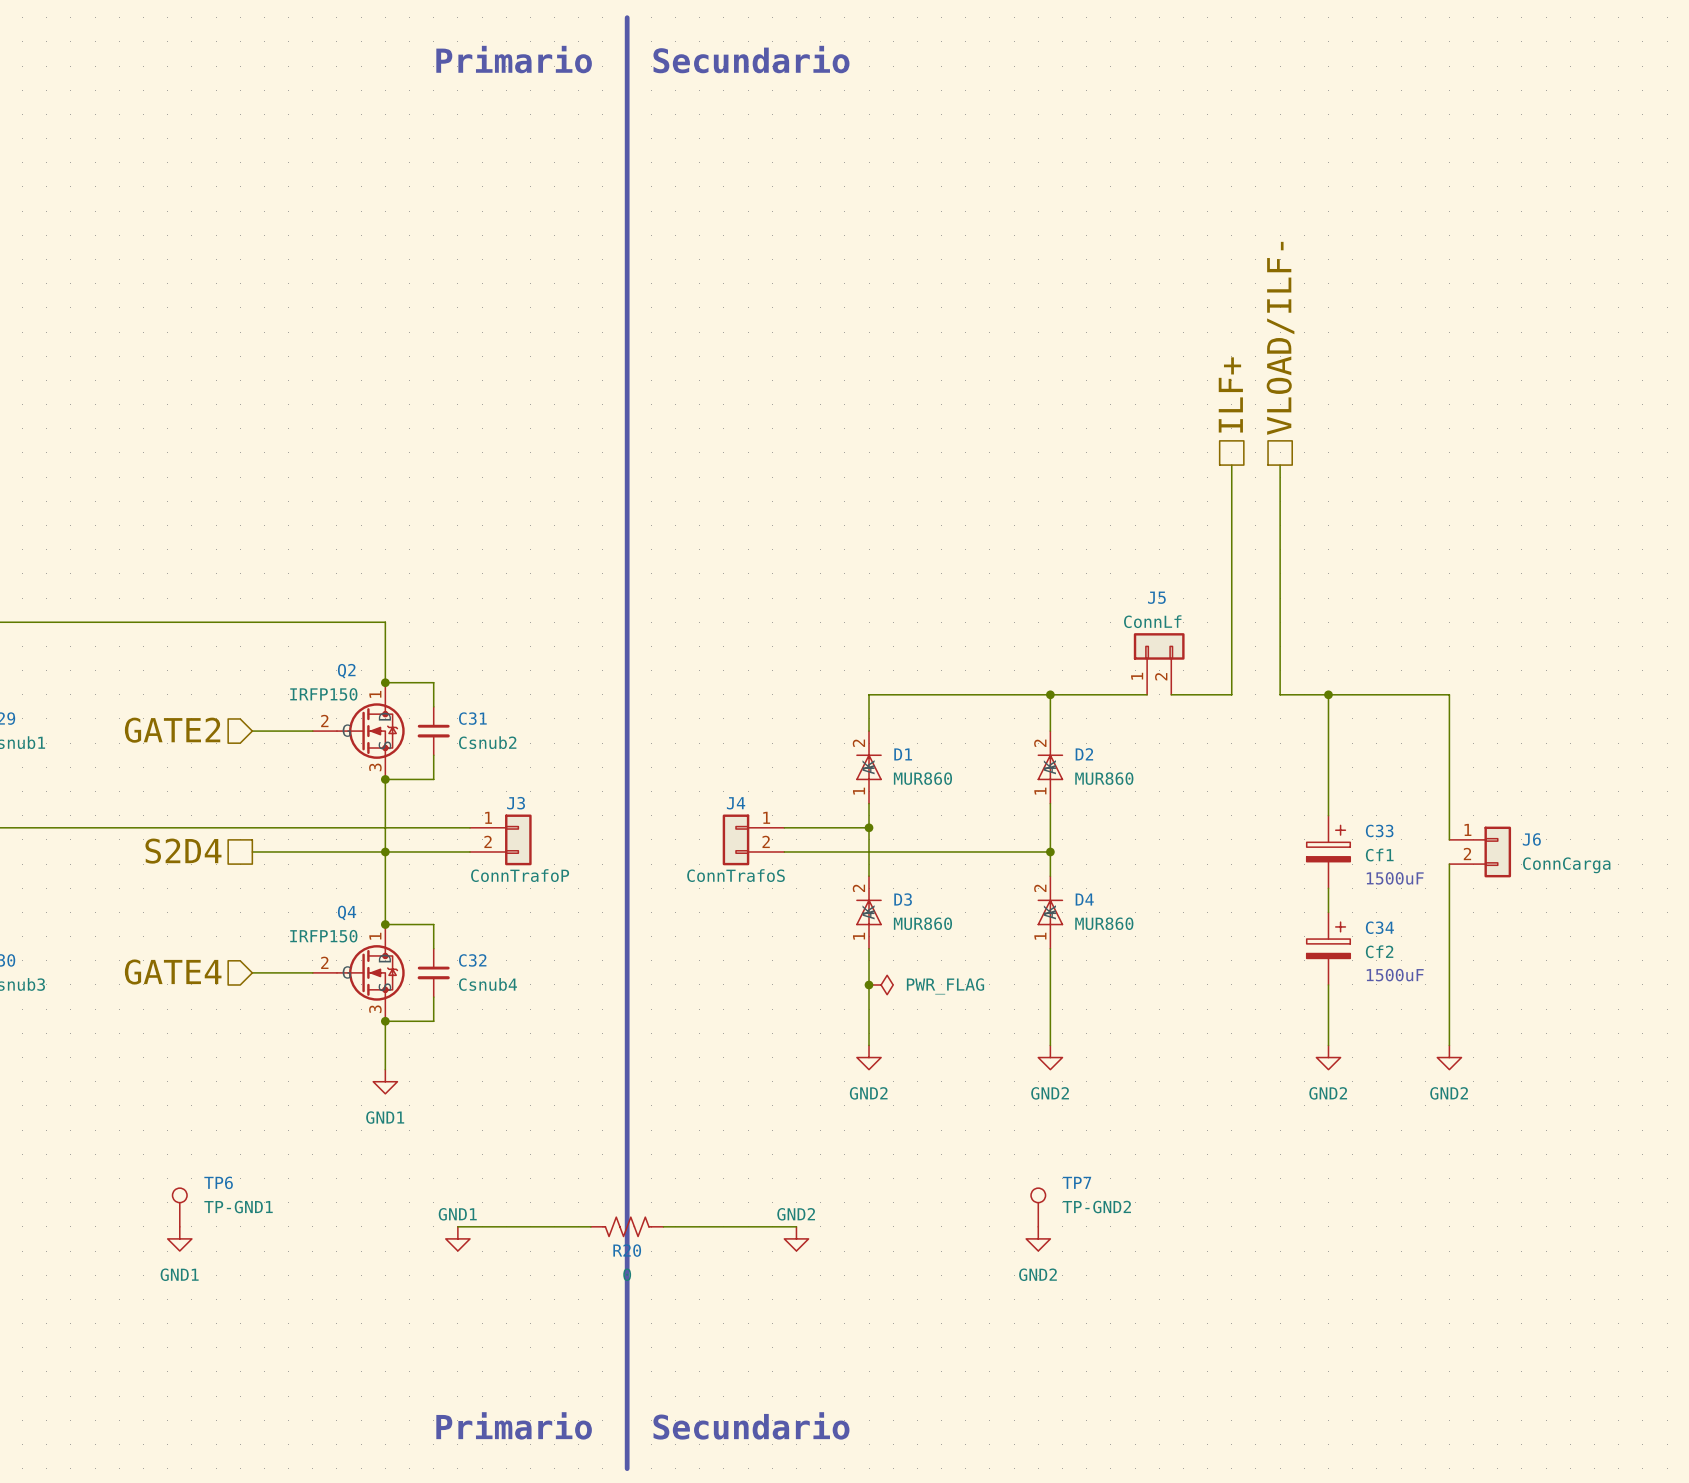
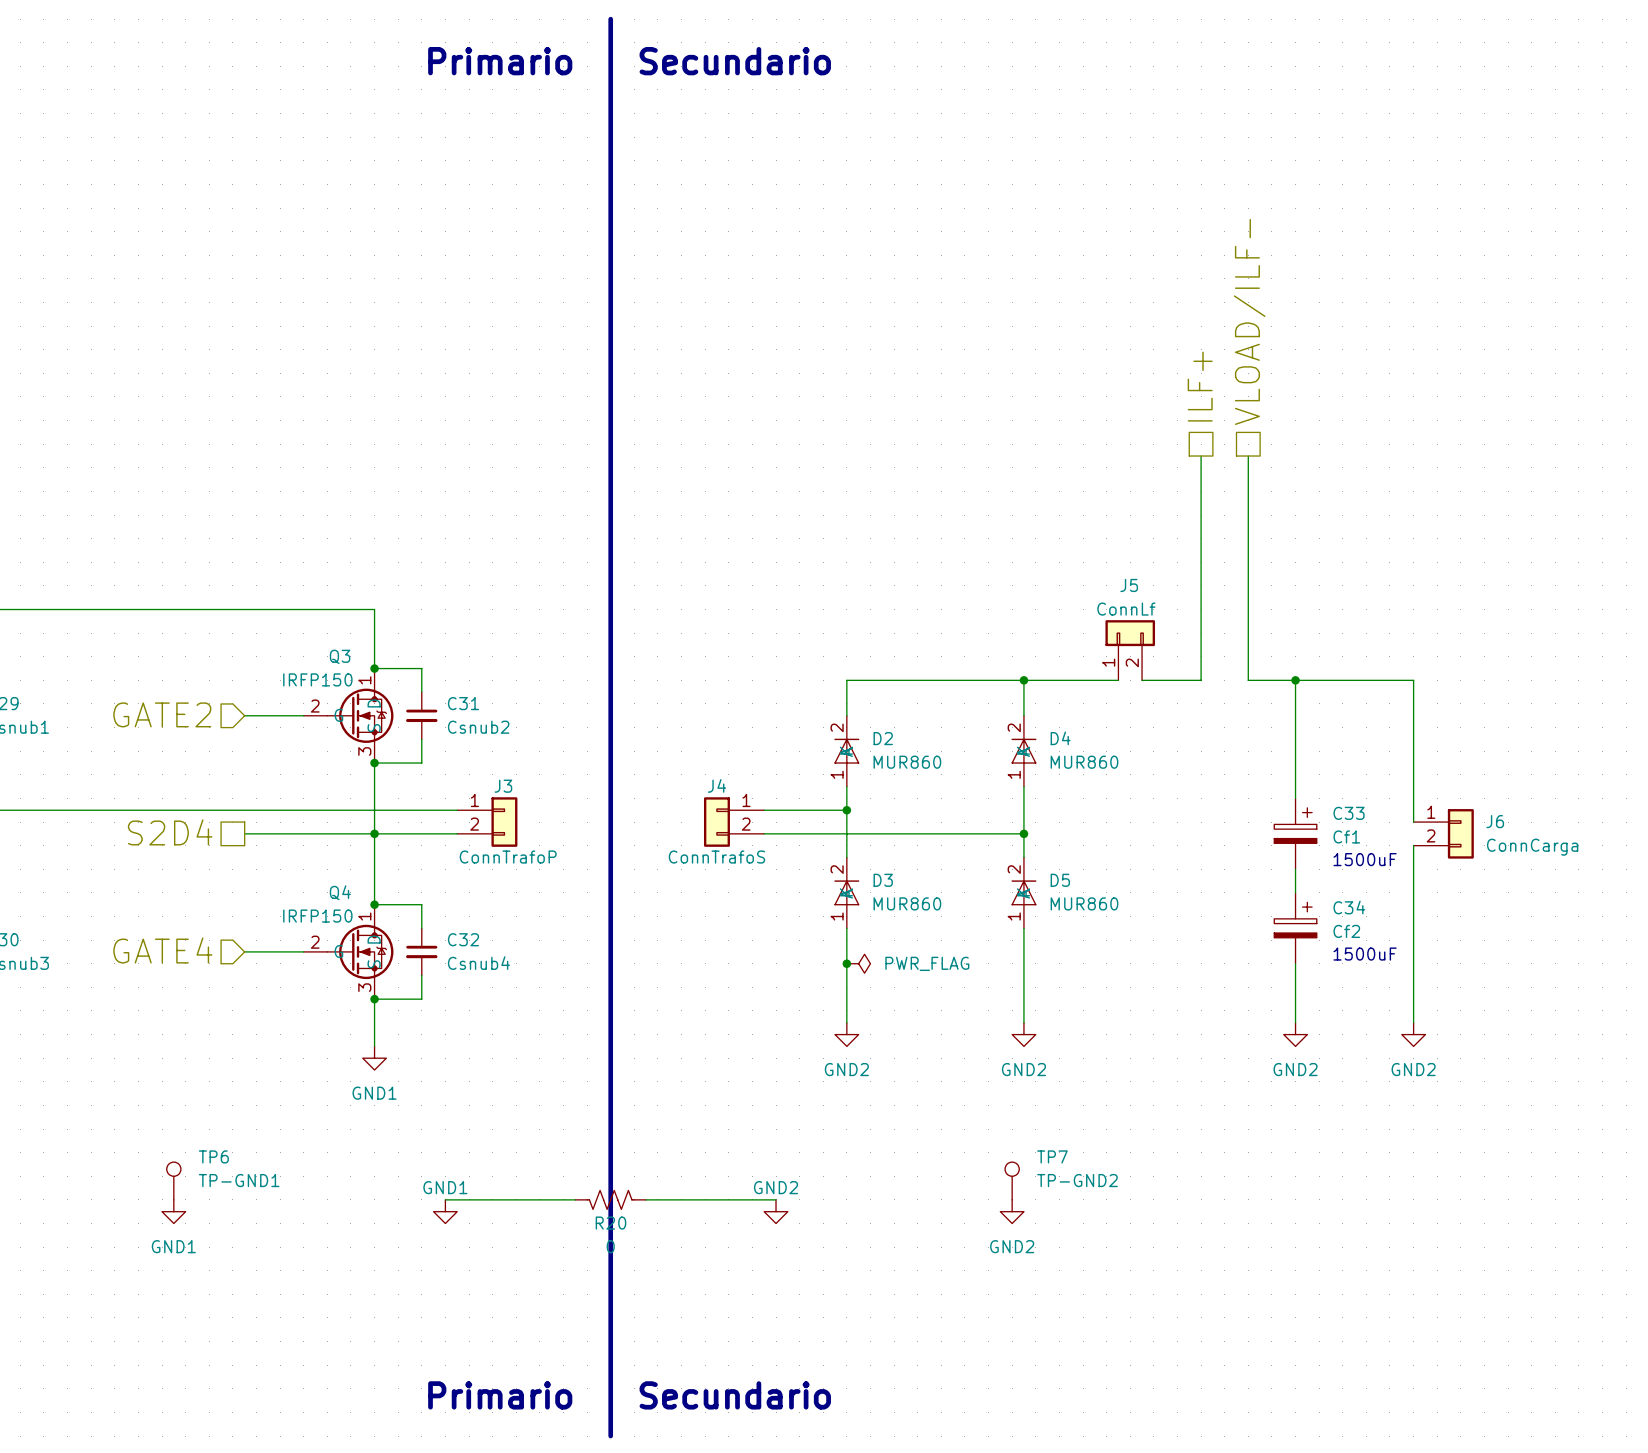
Q2 name: Q2 (346, 671) -> Q3 (340, 656)
D1 name: D1 (903, 754) -> D2 (883, 738)
D2 name: D2 (1084, 754) -> D4 (1060, 738)
D4 name: D4 (1084, 899) -> D5 (1060, 880)

